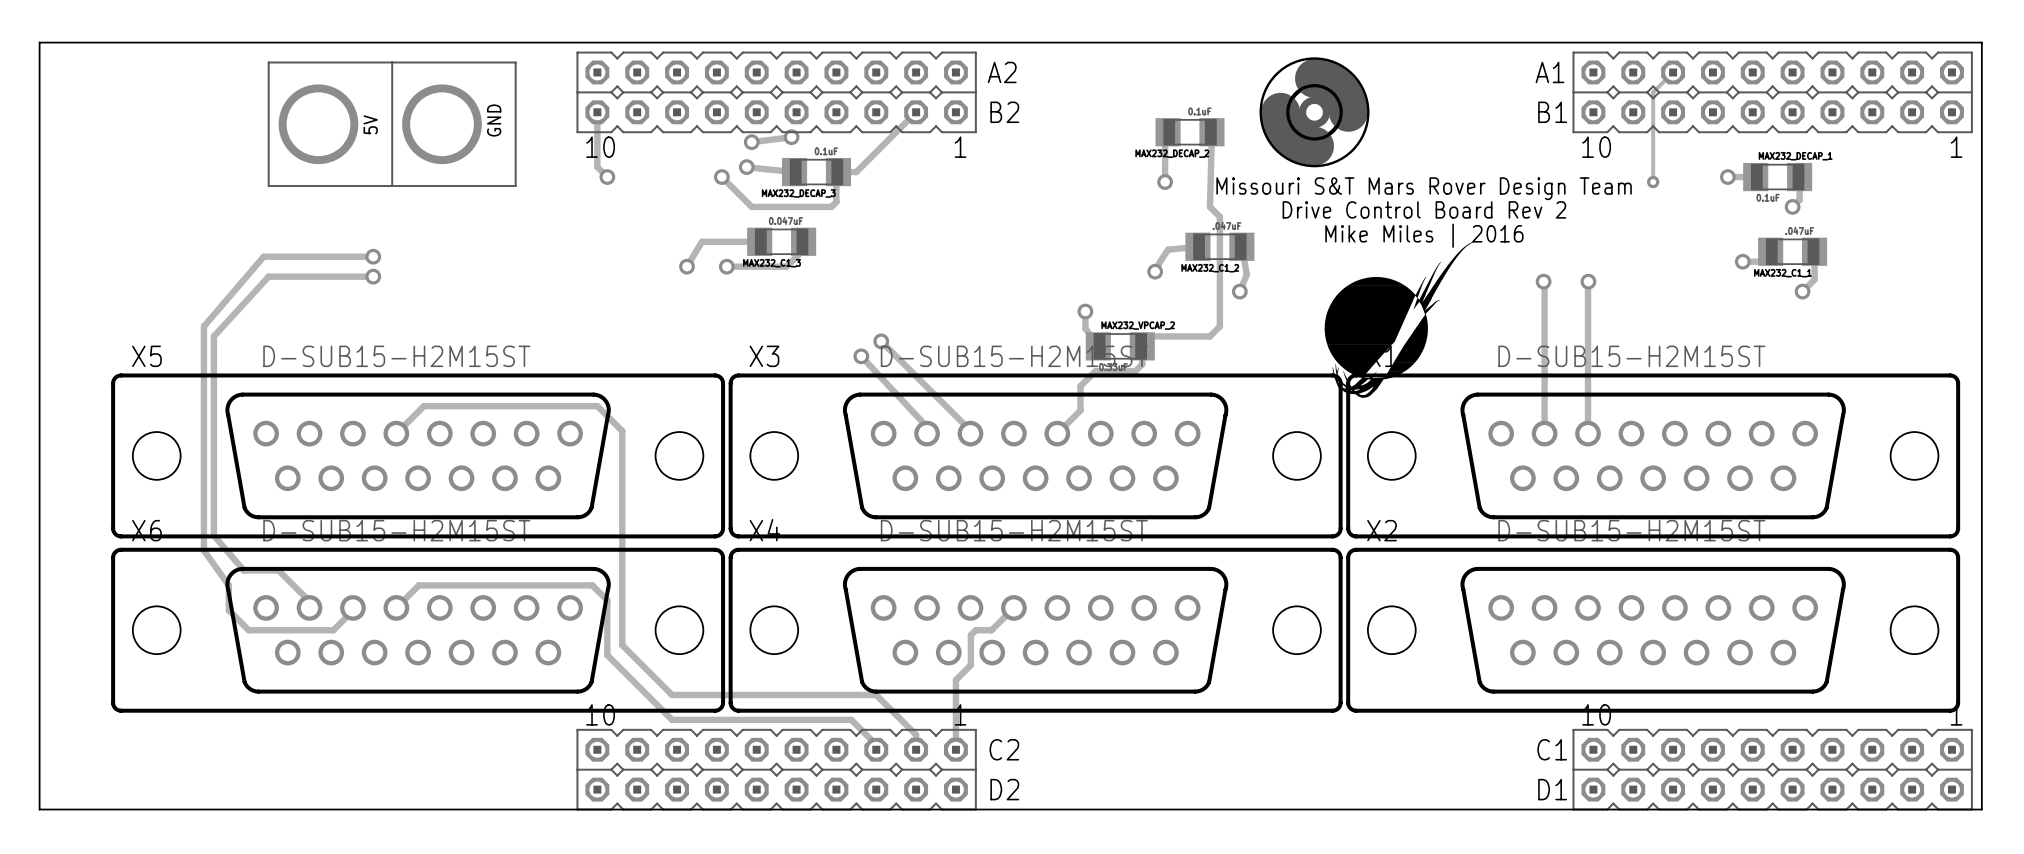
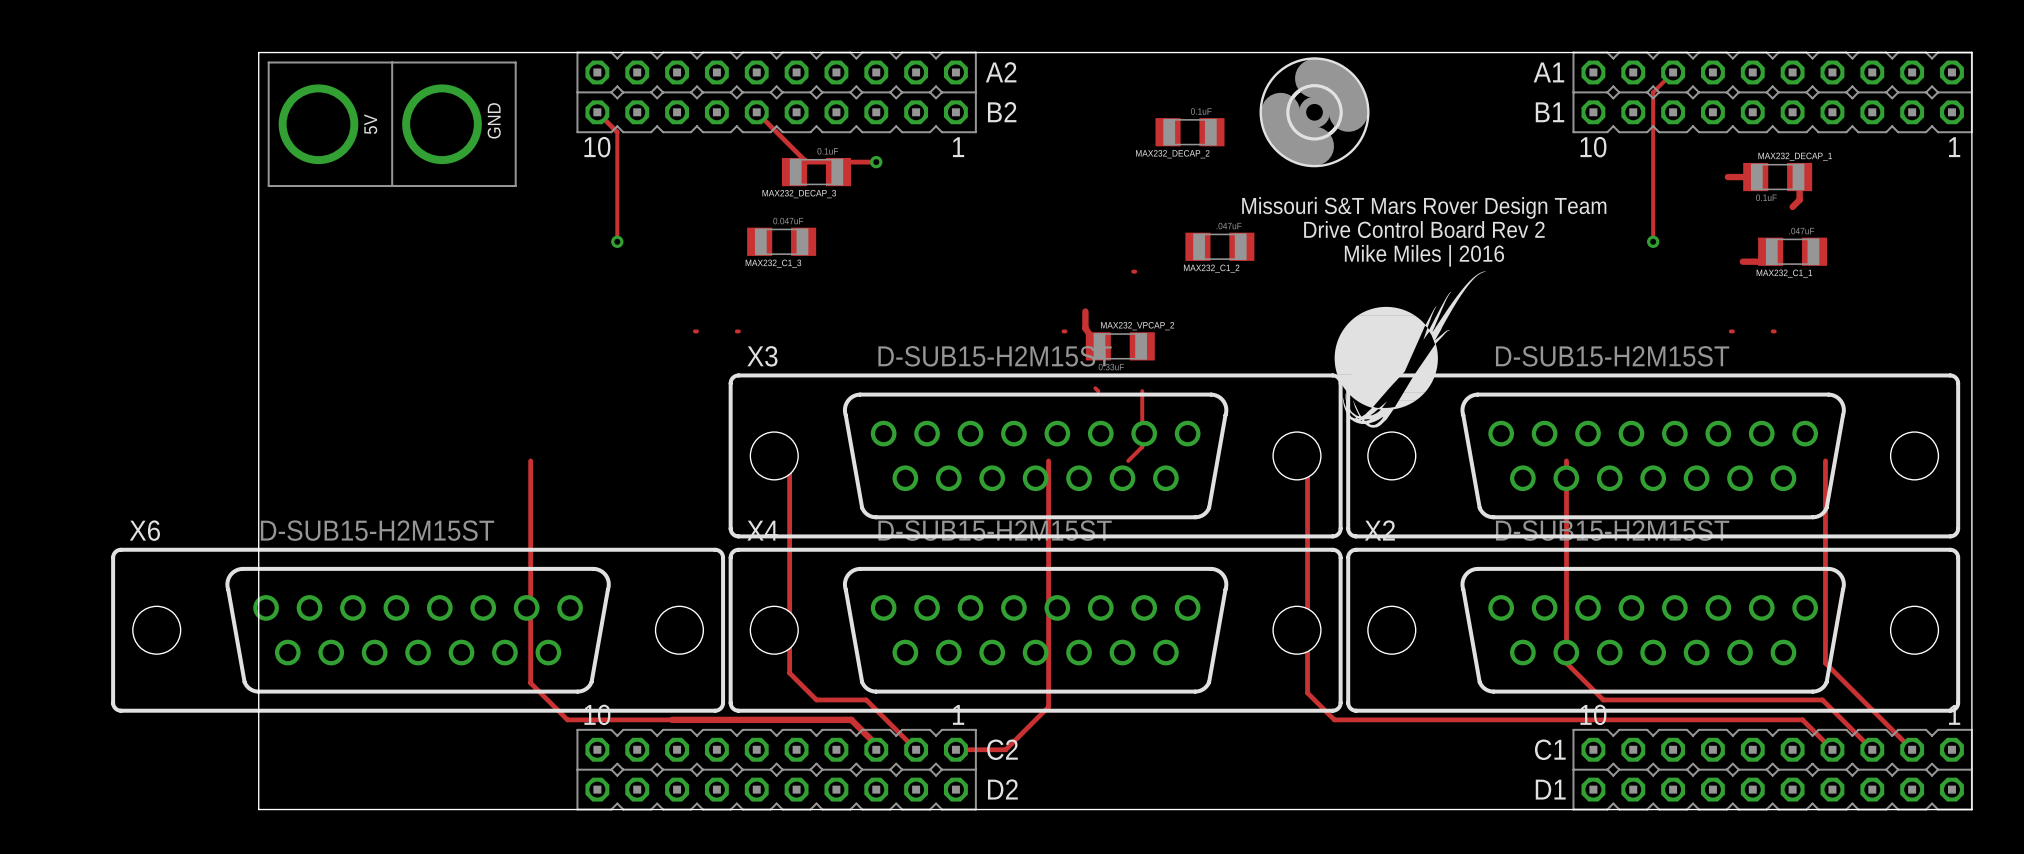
track: (597, 112) (597, 167) (607, 177) -> (597, 112) (617, 132) (617, 241)
track: none -> (756, 112) (806, 162) (876, 162)
track: (916, 112) (856, 172) (838, 172) (836, 174) (836, 201) (831, 206) (751, 206) (721, 177) -> none
track: (1168, 132) (1165, 135) (1165, 182) -> none
track: (1211, 132) (1209, 206) (1219, 216) (1219, 326) (1209, 336) (1150, 336) (1142, 338) (1142, 364) (1135, 371) (1095, 371) (1080, 386) (1080, 410) (1057, 433) -> none
track: (791, 137) (751, 142) -> none
via: (791, 137) -> none
via: (751, 142) -> none
via: none -> (876, 162)
track: (746, 167) (794, 172) -> none
via: (746, 167) -> none
via: (607, 177) -> none
via: (721, 177) -> none
via: (1727, 177) -> none
via: (1165, 182) -> none
track: none -> (1653, 182) (1653, 241)
via position: (1653, 182) -> (1653, 241)
text position: Missouri S&T Mars Rover Design Team (1424, 188) -> Missouri S&T Mars Rover Design Team (1424, 207)
via: (1792, 206) -> none
text position: Drive Control Board Rev 2 (1424, 209) -> Drive Control Board Rev 2 (1424, 229)
text position: Mike Miles | 2016 (1424, 235) -> Mike Miles | 2016 (1424, 255)
via: none -> (617, 241)
track: (759, 241) (701, 241) (687, 266) -> none
track: (803, 241) (798, 254) (786, 266) (726, 266) -> none
track: (1197, 246) (1168, 249) (1155, 271) -> none
track: (1241, 246) (1246, 274) (1239, 291) -> none
track: (1814, 251) (1814, 279) (1802, 291) -> none
track: (373, 256) (263, 256) (203, 326) (203, 550) (228, 585) (228, 610) (248, 630) (333, 630) (352, 610) (352, 607) -> none
via: (373, 256) -> none
via: (1742, 261) -> none
via: (687, 266) -> none
via: (726, 266) -> none
track: none -> (1133, 271) (1135, 271)
via: (1155, 271) -> none
track: (373, 276) (268, 276) (213, 336) (213, 535) (243, 570) (278, 570) (309, 601) (309, 607) -> none
via: (373, 276) -> none
track: (1543, 281) (1544, 433) -> none
via: (1543, 281) -> none
track: (1588, 281) (1588, 433) -> none
via: (1588, 281) -> none
via: (1239, 291) -> none
via: (1802, 291) -> none
via: (1085, 311) -> none
drawing position: (1400, 319) -> (1410, 349)
track: none -> (694, 331) (696, 331)
track: none -> (736, 331) (738, 331)
track: none -> (1063, 331) (1065, 331)
track: none -> (1730, 331) (1732, 331)
track: none -> (1772, 331) (1774, 331)
track: (881, 341) (970, 430) (970, 433) -> none
via: (881, 341) -> none
track: (861, 356) (927, 427) (927, 433) -> none
via: (861, 356) -> none
track: none -> (1095, 388) (1098, 391)
track: none -> (1142, 391) (1142, 446) (1128, 460)
track: (396, 433) (423, 406) (597, 406) (622, 431) (622, 645) (672, 694) (876, 694) (916, 734) (916, 749) -> (789, 460) (789, 673) (816, 699) (866, 699) (916, 749)
X5: D-SUB15-H2M15ST (418, 455) -> none
track: none -> (1307, 460) (1307, 692) (1334, 719) (1802, 719) (1832, 749)
track: none -> (1566, 460) (1566, 663) (1603, 699) (1822, 699) (1872, 749)
track: none -> (1825, 460) (1825, 663) (1912, 749)
track: (396, 607) (418, 585) (592, 585) (607, 600) (607, 655) (672, 719) -> (530, 460) (530, 683) (567, 719) (672, 719)
track: (1013, 607) (991, 630) (975, 630) (970, 635) (970, 665) (955, 680) (955, 749) -> (1048, 460) (1048, 706) (1005, 749) (955, 749)
board edge: (258, 809) (39, 809) (39, 42) (1981, 42) (1981, 809) (1971, 809) -> (258, 809) (258, 52) (1971, 52) (1971, 809)

